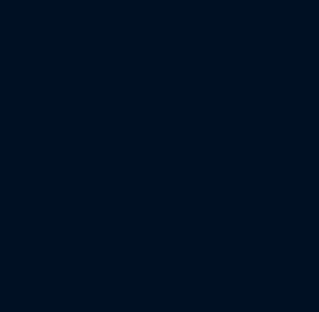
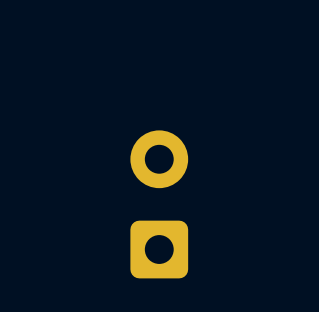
part: none -> (159, 204)

